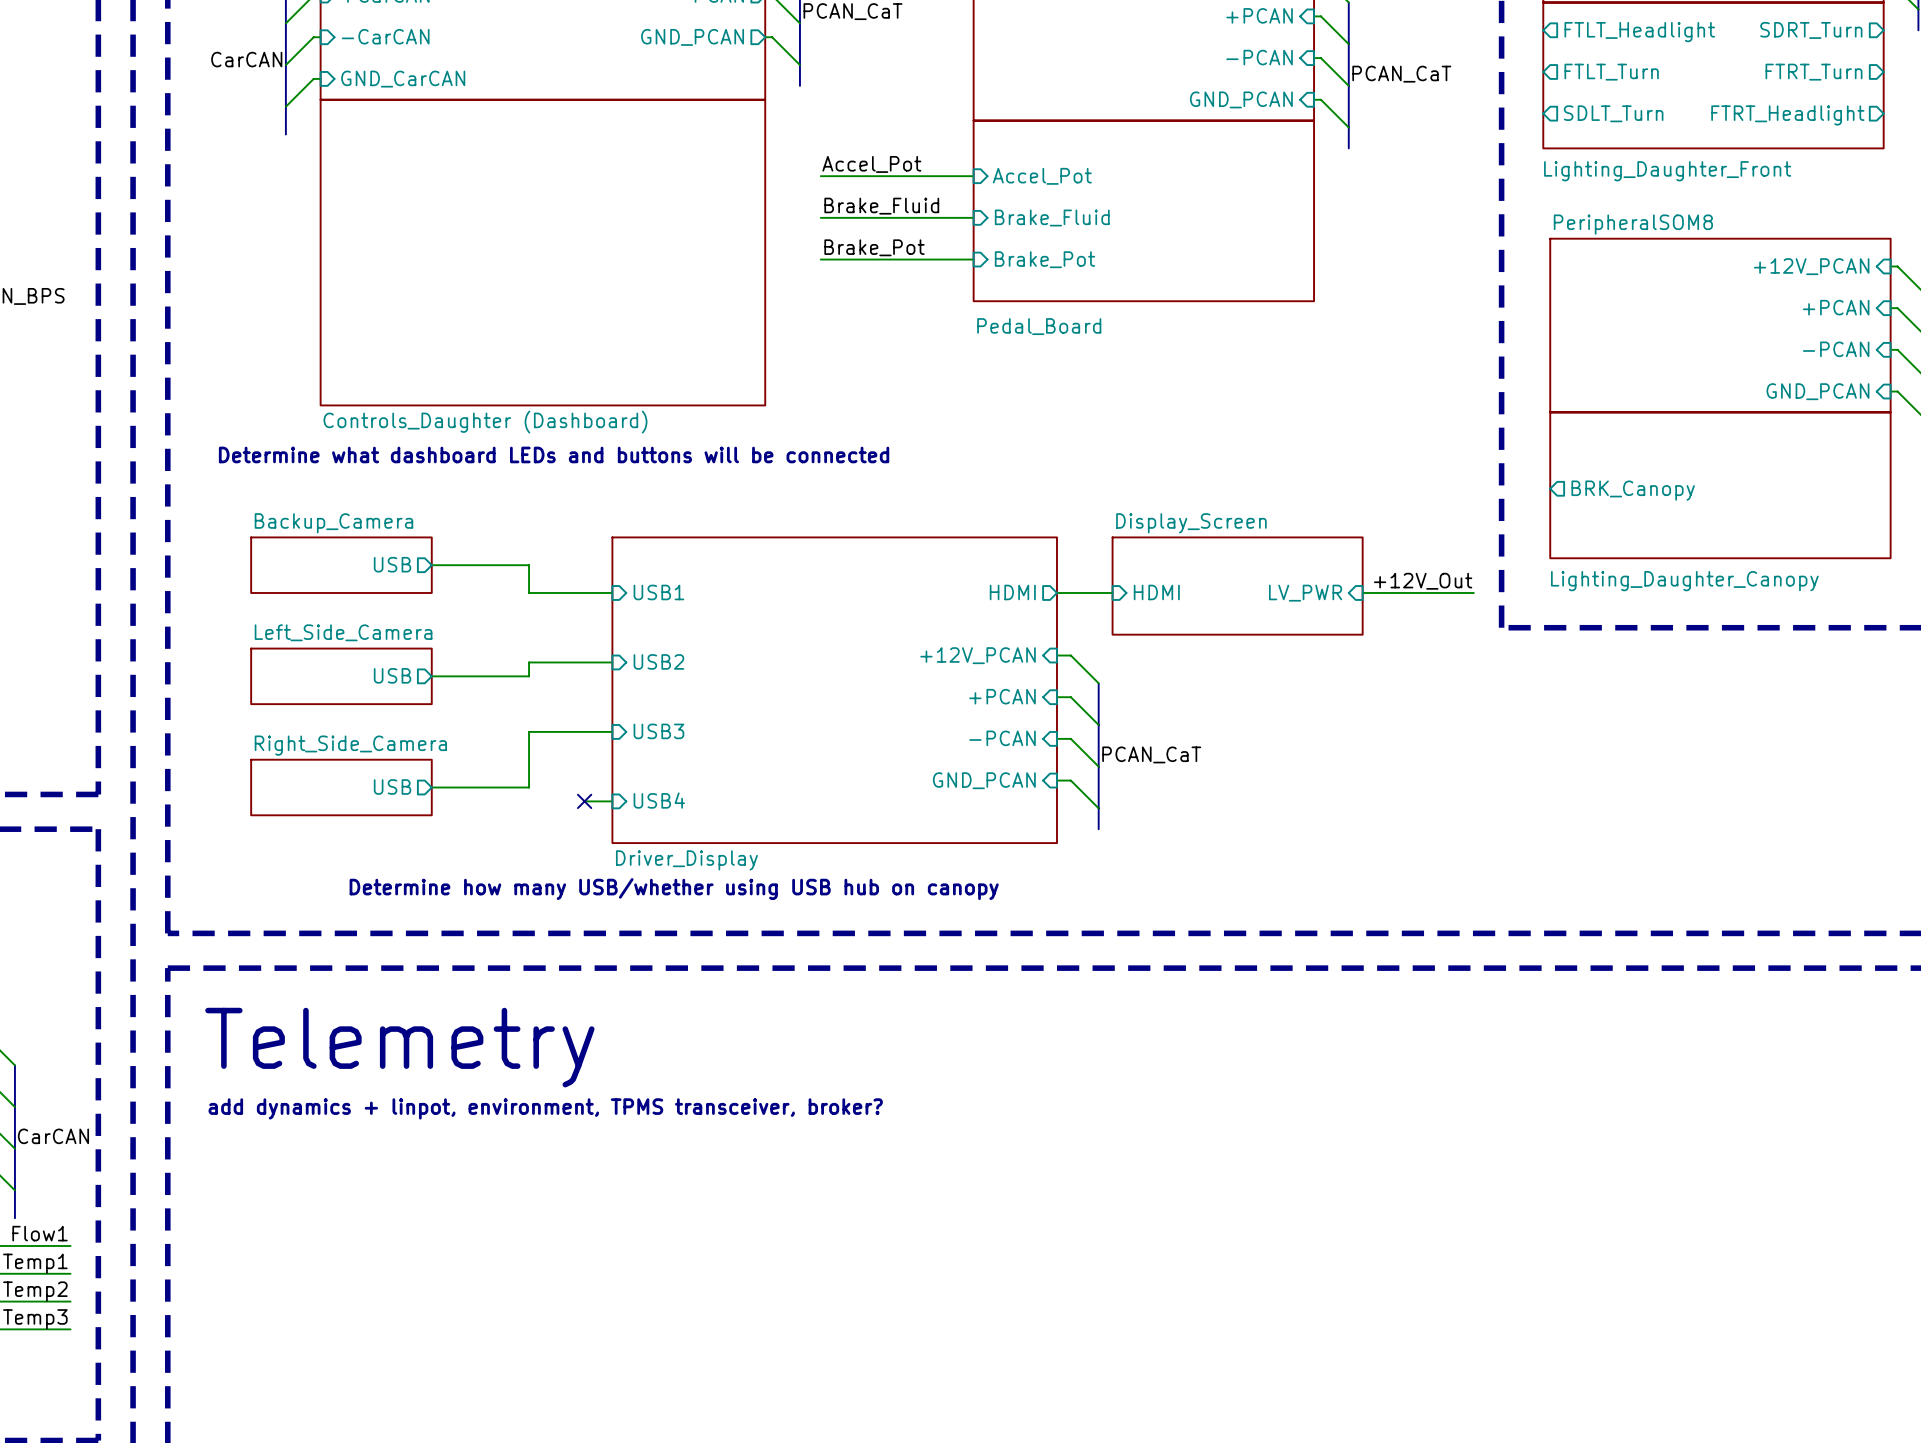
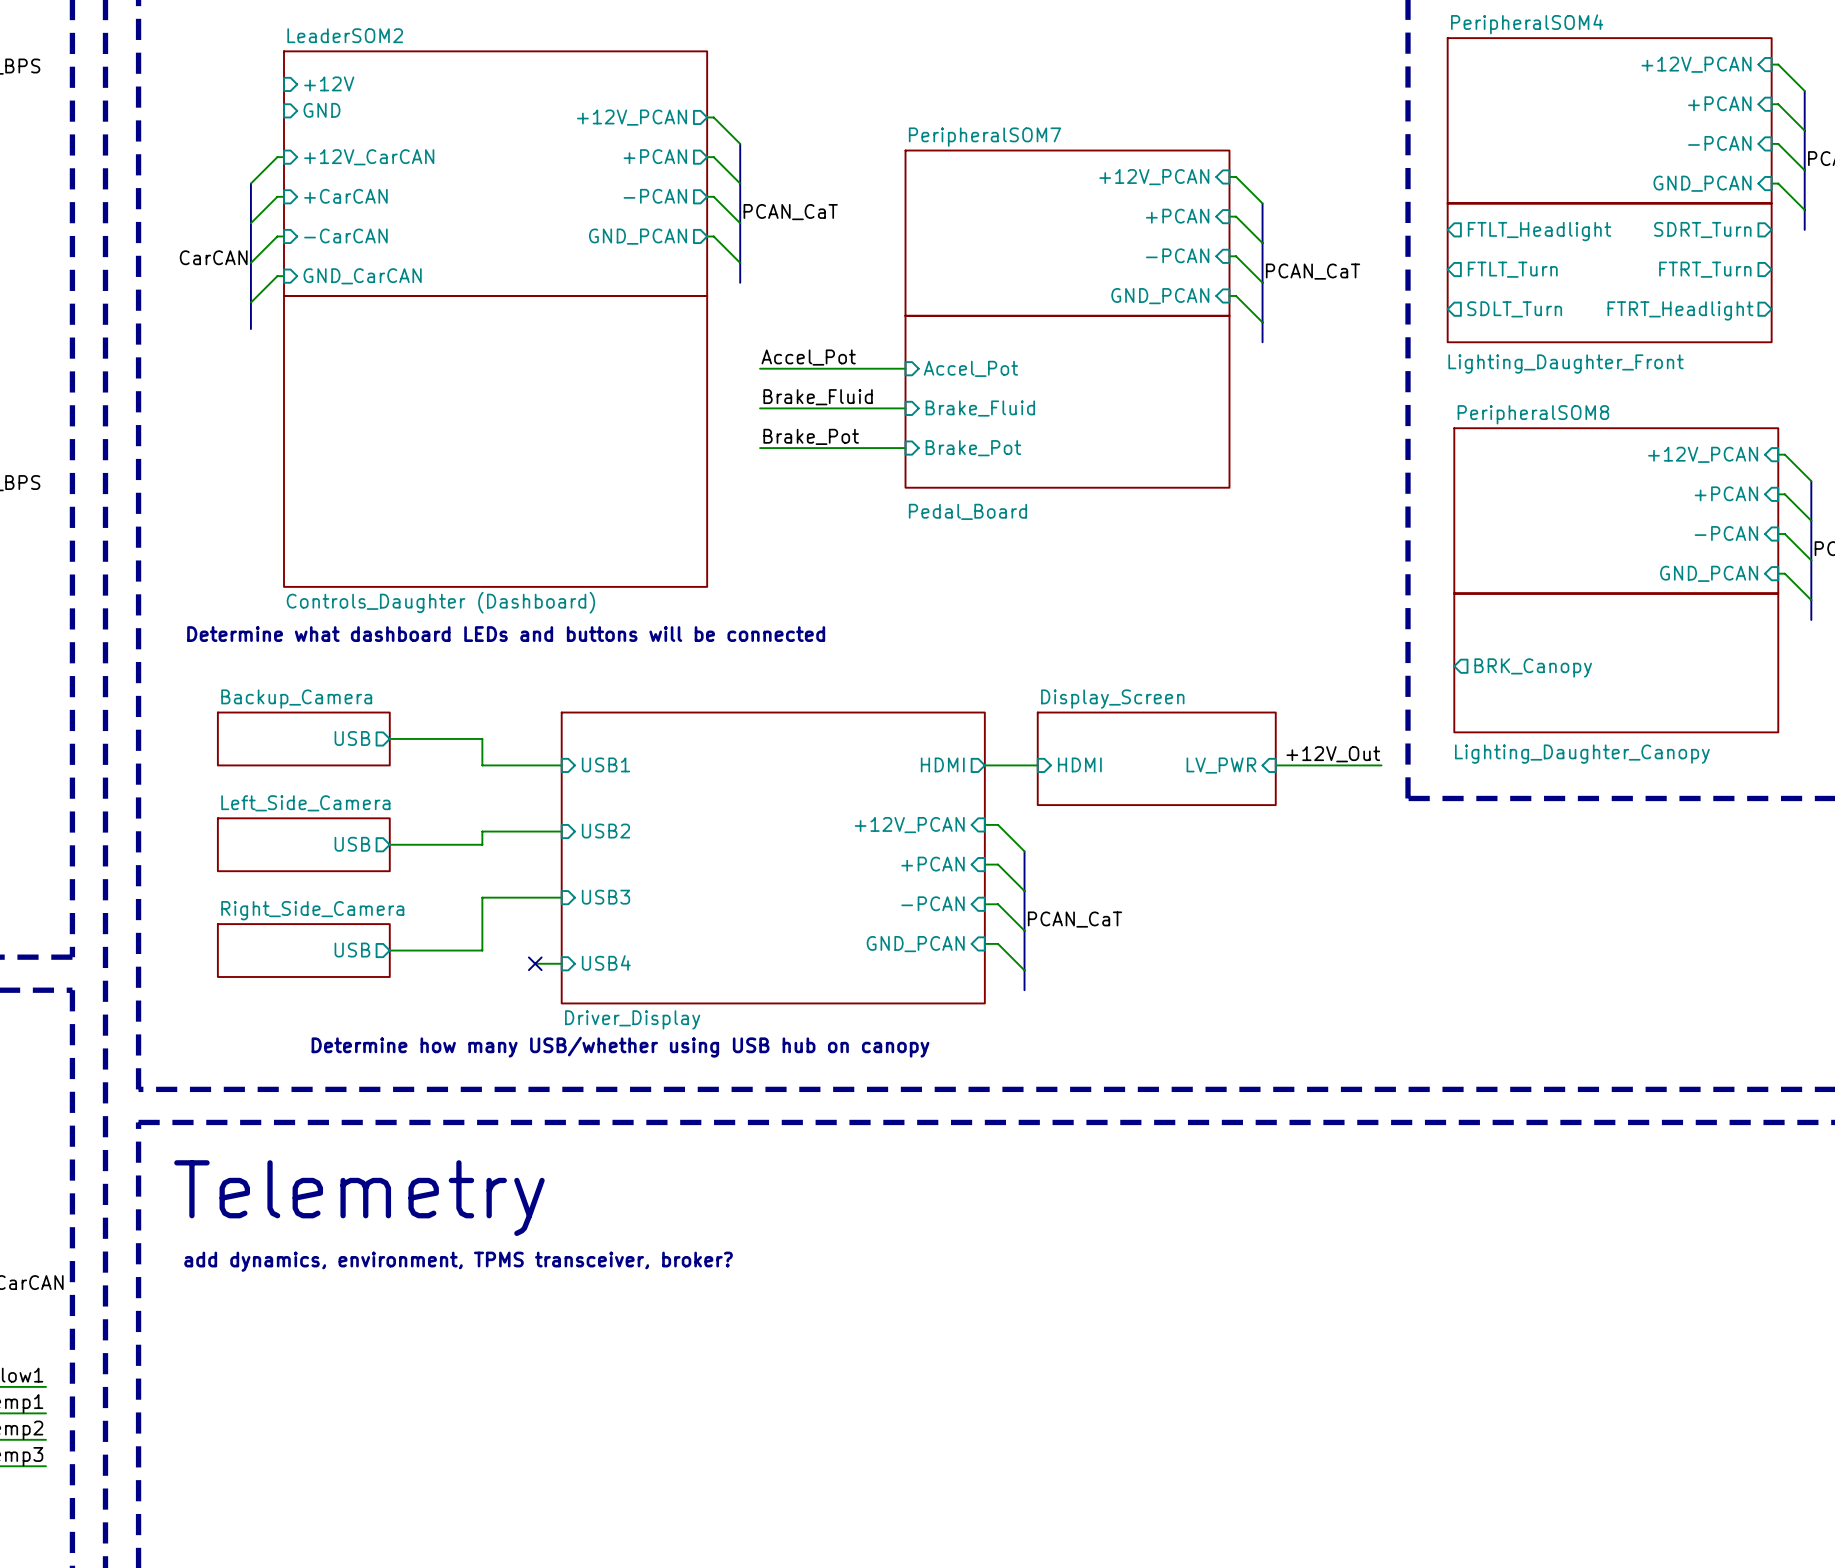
text: add dynamics + linpot, environment, TPMS transceiver, broker? (545, 1108) -> add dynamics, environment, TPMS transceiver, broker? (458, 1261)

